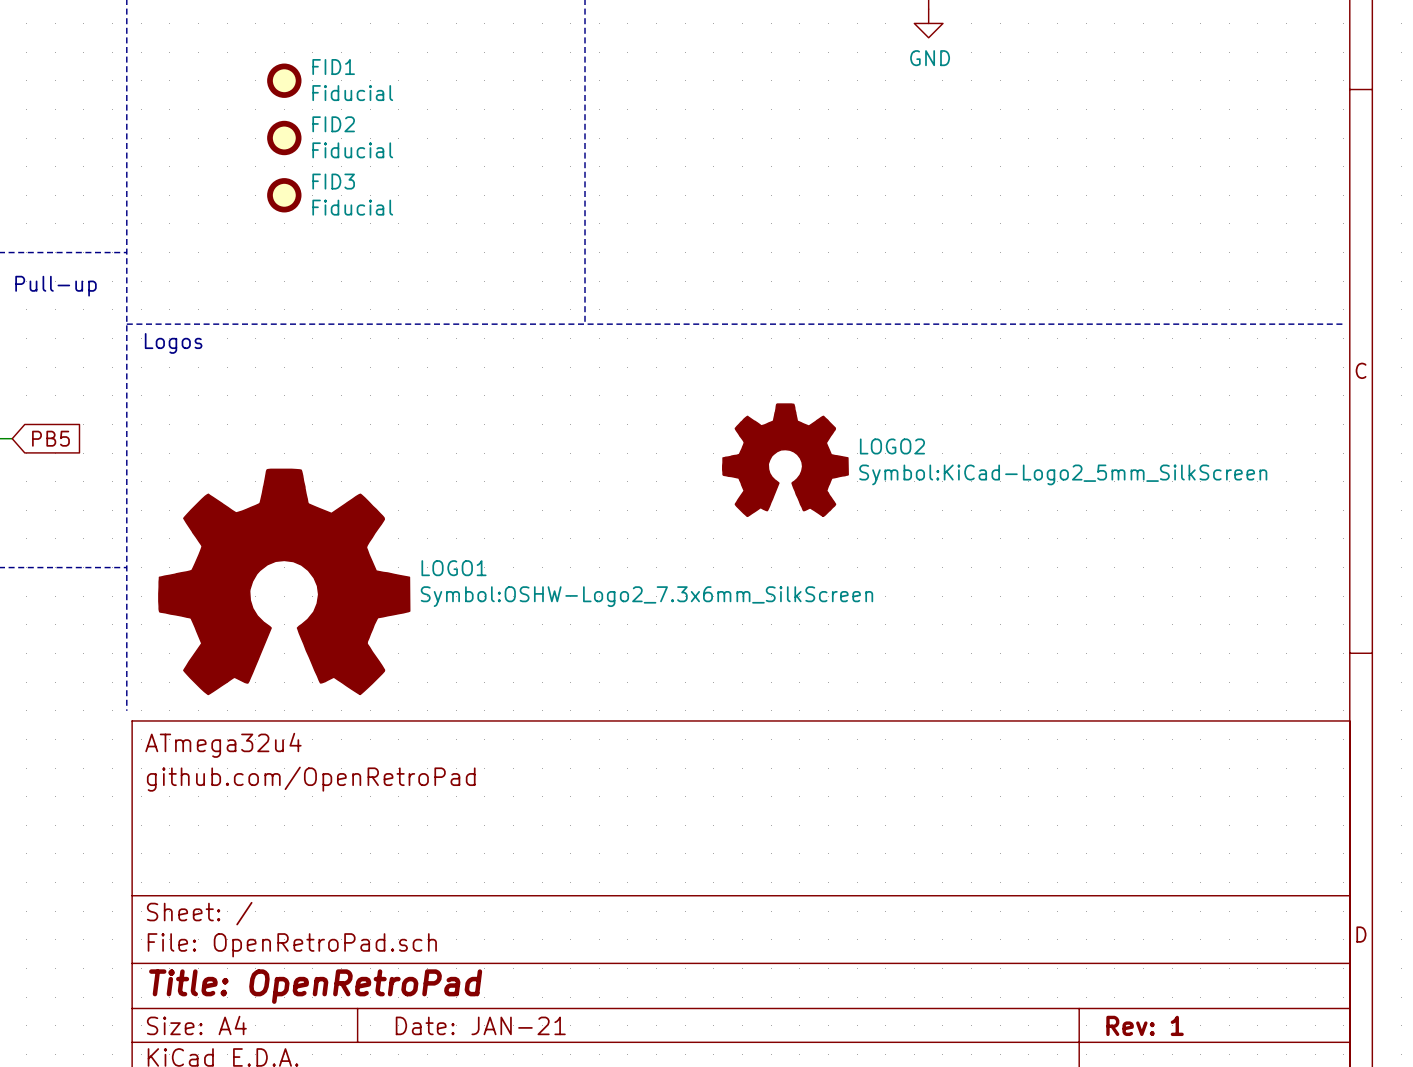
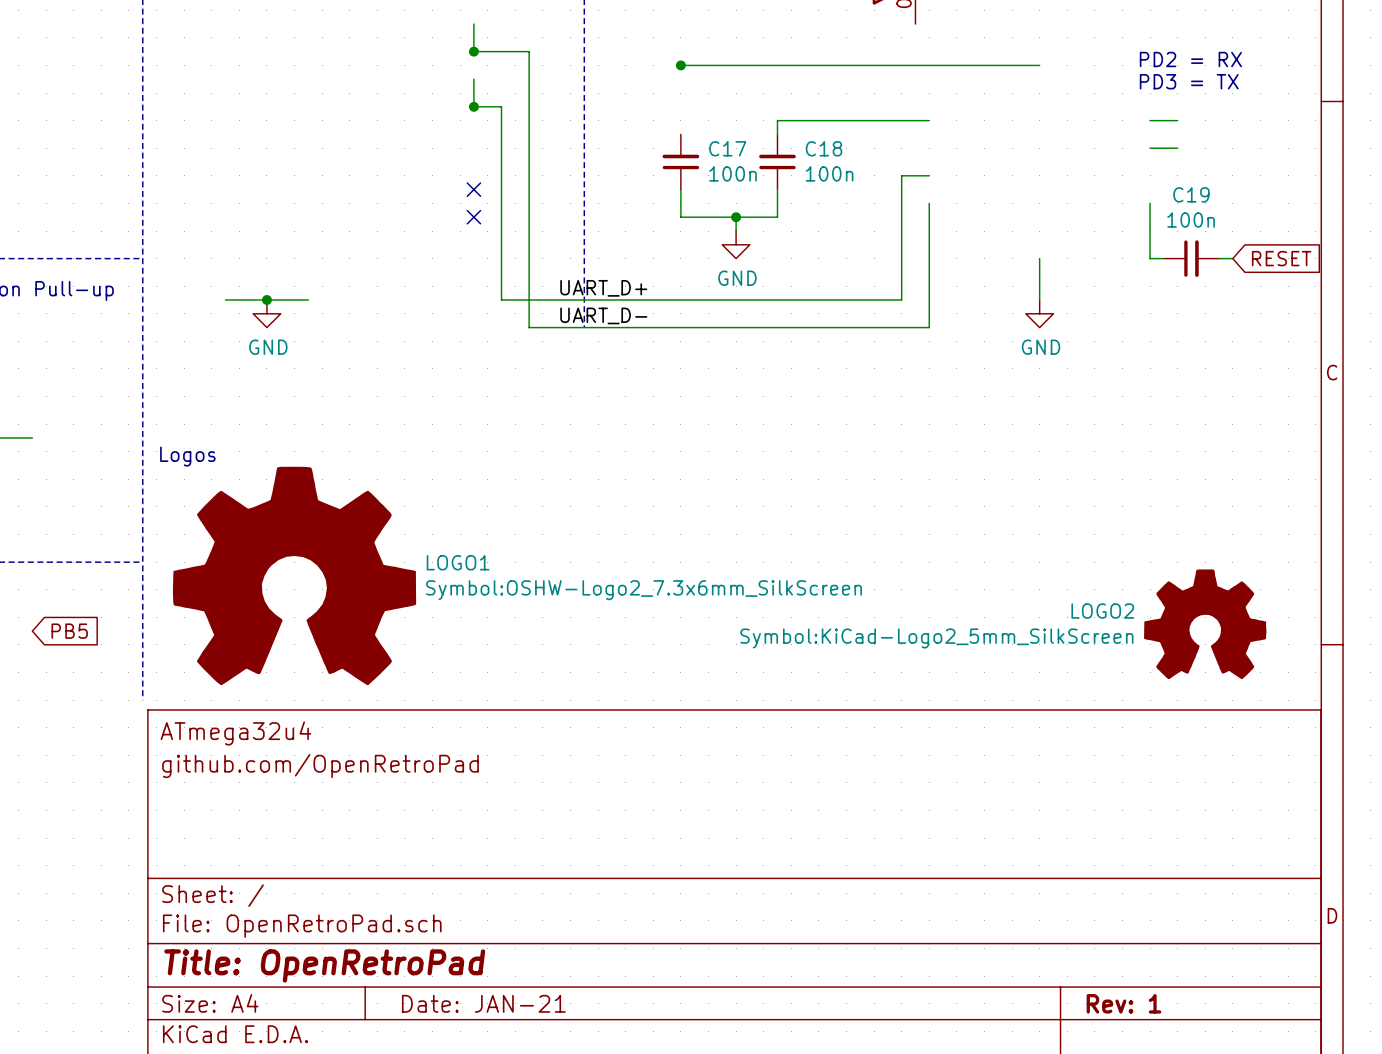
wire: none -> (473, 24) (473, 51) (529, 51) (529, 327) (929, 327) (929, 203)
power symbol: GND (928, 23) -> none
junction: none -> (473, 51)
text: none -> PD2 = RX (1190, 59)
wire: none -> (680, 65) (1039, 65)
junction: none -> (680, 65)
wire: none -> (473, 79) (473, 106) (501, 106) (501, 299) (901, 299) (901, 175) (929, 175)
text: none -> PD3 = TX (1189, 81)
FID1: Fiducial (284, 80) -> none
junction: none -> (473, 106)
wire: none -> (929, 120) (777, 120) (777, 134)
wire: none -> (1150, 120) (1177, 120)
FID2: Fiducial (284, 138) -> none
wire: none -> (1150, 148) (1177, 148)
C17: none -> 100n (680, 162)
C18: none -> 100n (777, 162)
no-connect mark: none -> (473, 189)
wire: none -> (680, 189) (680, 217) (777, 217) (777, 189)
FID3: Fiducial (284, 195) -> none
wire: none -> (1150, 203) (1150, 258) (1163, 258)
no-connect mark: none -> (473, 217)
wire: none -> (736, 217) (736, 231)
junction: none -> (736, 217)
power symbol: none -> GND (736, 244)
wire: none -> (1039, 258) (1039, 299)
C19: none -> 100n (1191, 258)
wire: none -> (1219, 258) (1232, 258)
global label: none -> RESET (1281, 258)
label: none -> UART_D+ (603, 288)
wire: none -> (225, 299) (308, 299)
junction: none -> (266, 299)
power symbol: none -> GND (266, 313)
power symbol: none -> GND (1039, 313)
label: none -> UART_D- (603, 315)
line: (126, 324) (1343, 324) -> none
text position: Logos (173, 343) -> Logos (187, 456)
global label position: PB5 (50, 438) -> PB5 (69, 631)
LOGO2 flip: as is (785, 460) -> left-right (1205, 624)
LOGO2 position: (785, 460) -> (1205, 624)

